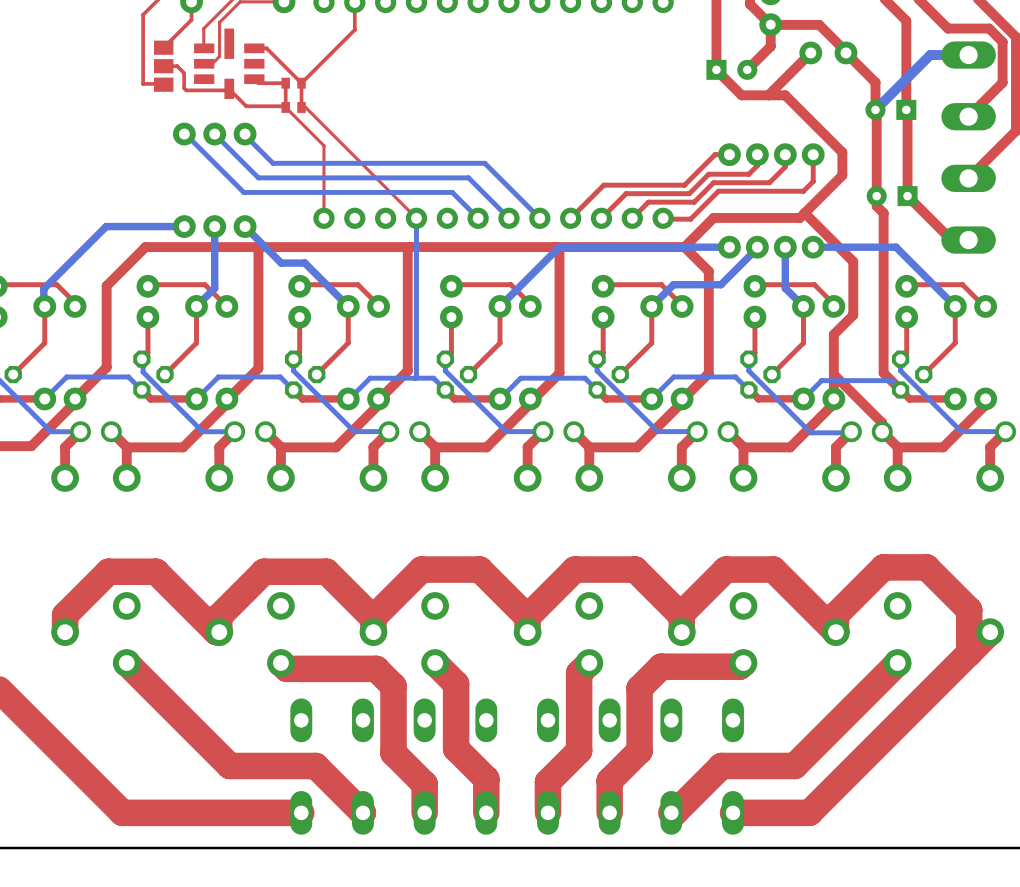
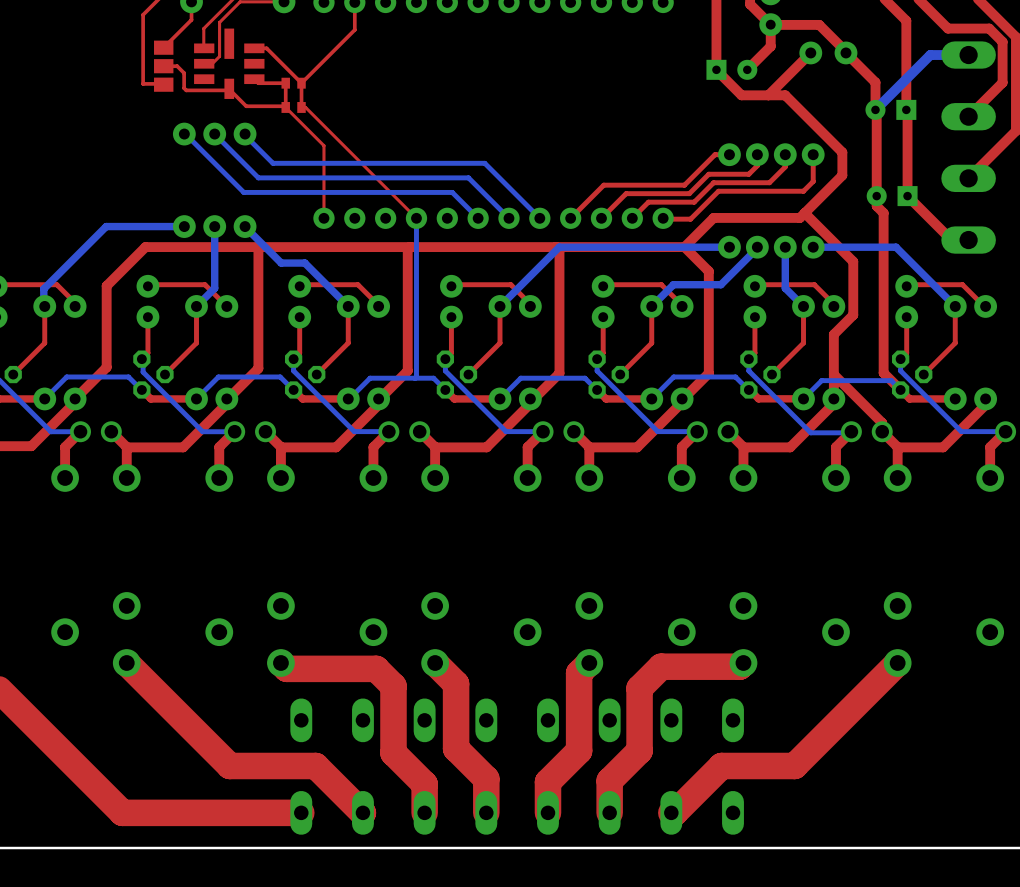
top track: (681, 613) (725, 569) (773, 569) (835, 632) (835, 614) (883, 567) (926, 567) (969, 609) (969, 653) -> none
top track: (681, 613) (679, 613) (635, 569) (574, 569) (527, 616) -> none
top track: (527, 616) (479, 569) (421, 569) (373, 617) -> none
top track: (373, 617) (326, 571) (263, 571) (219, 616) (219, 632) (216, 632) (156, 571) (108, 571) (65, 615) (65, 632) -> none
top track: (990, 632) (809, 812) (733, 812) -> none

